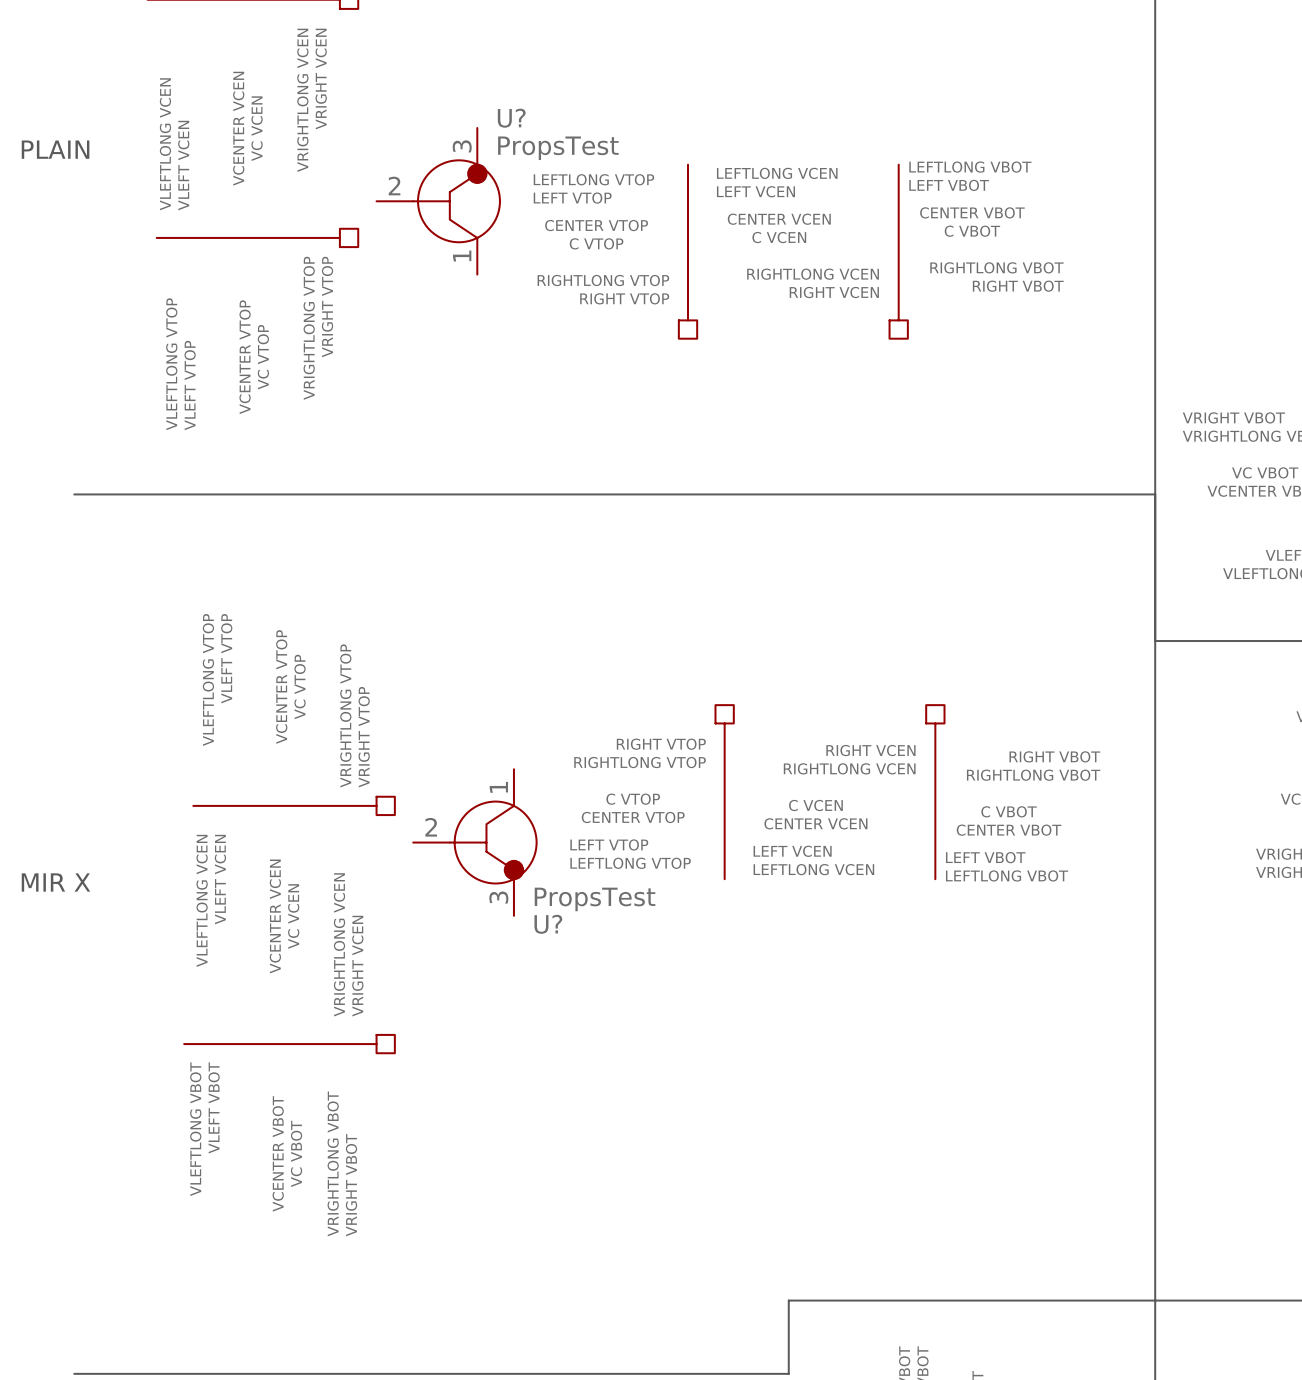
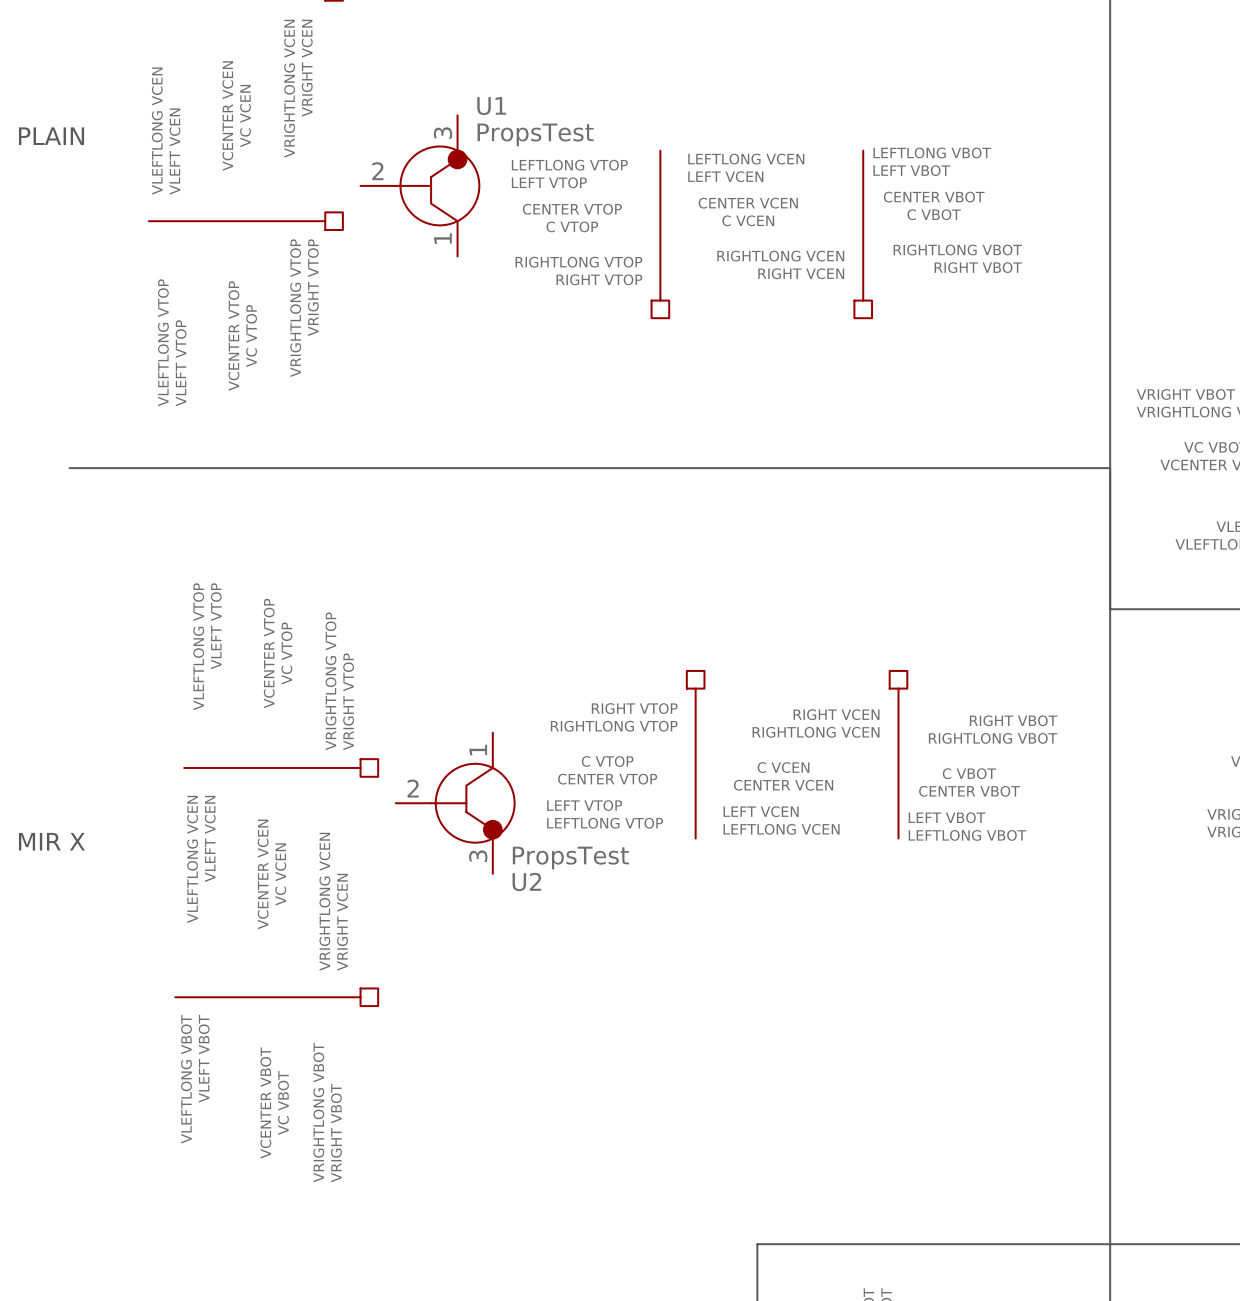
U? name: U? (511, 118) -> U1 (491, 106)
U? name: U? (548, 924) -> U2 (526, 881)

